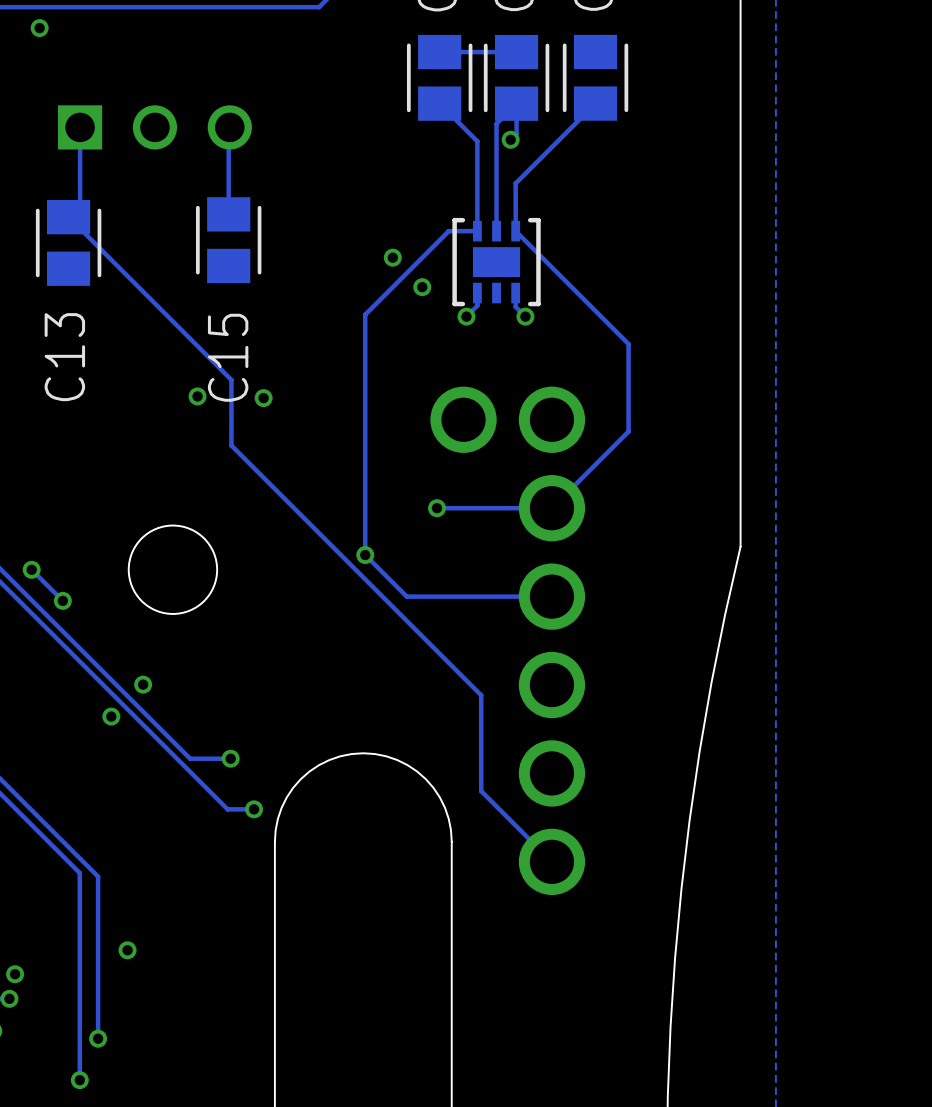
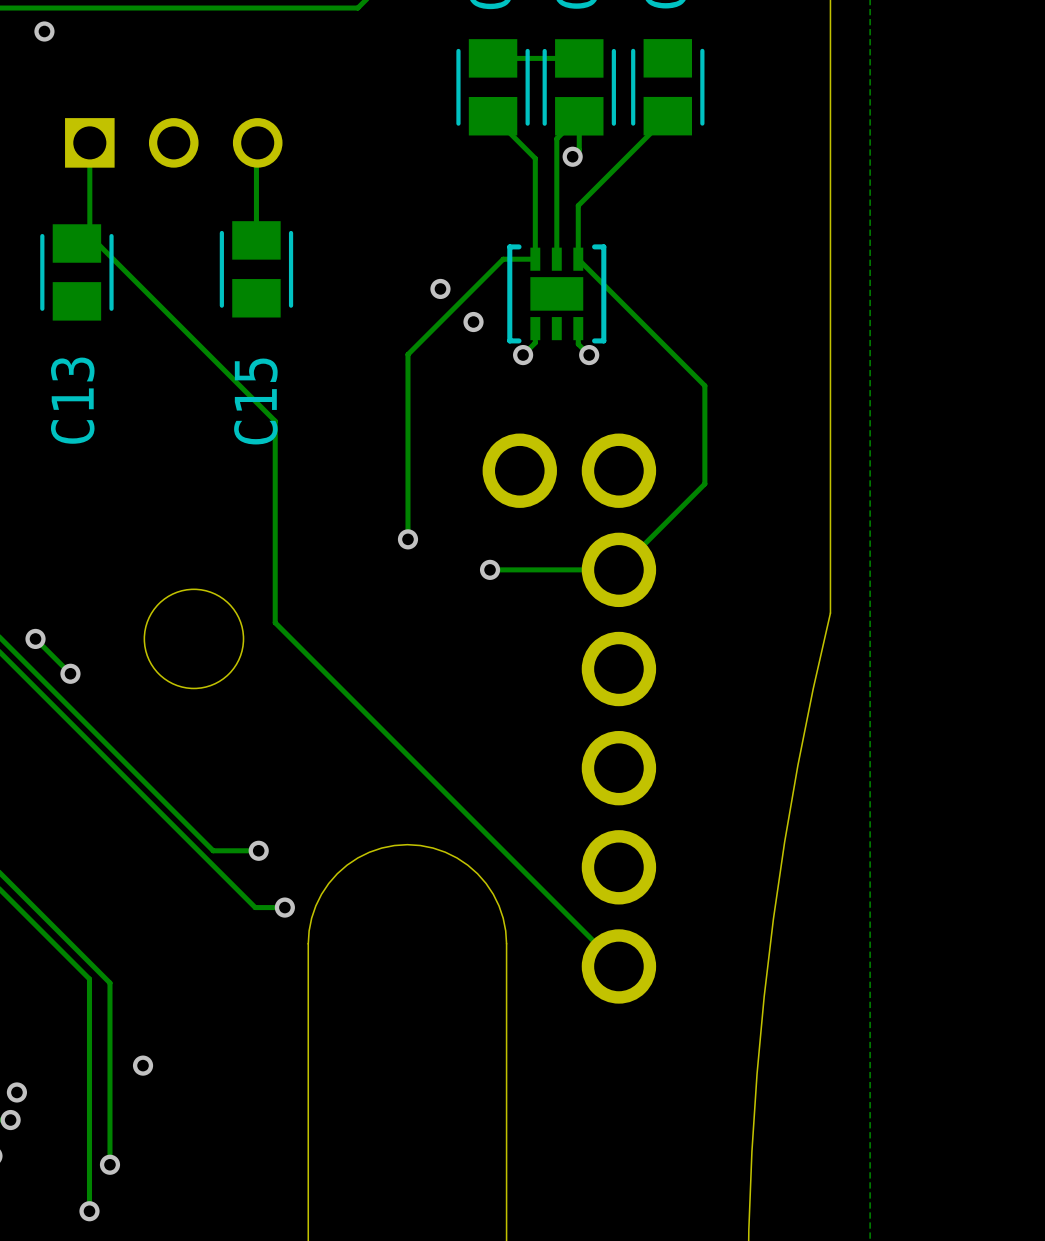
track: (68, 217) (231, 379) (231, 445) (481, 695) (481, 791) -> (97, 243) (275, 421) (275, 622) (539, 887)
track: (365, 314) (365, 555) (406, 596) (551, 596) -> (409, 352) (407, 354) (407, 539)
via: (197, 396) -> none
via: (263, 398) -> none
via: none -> (407, 539)
via: (365, 555) -> none
via: (143, 684) -> none
via: (111, 716) -> none

